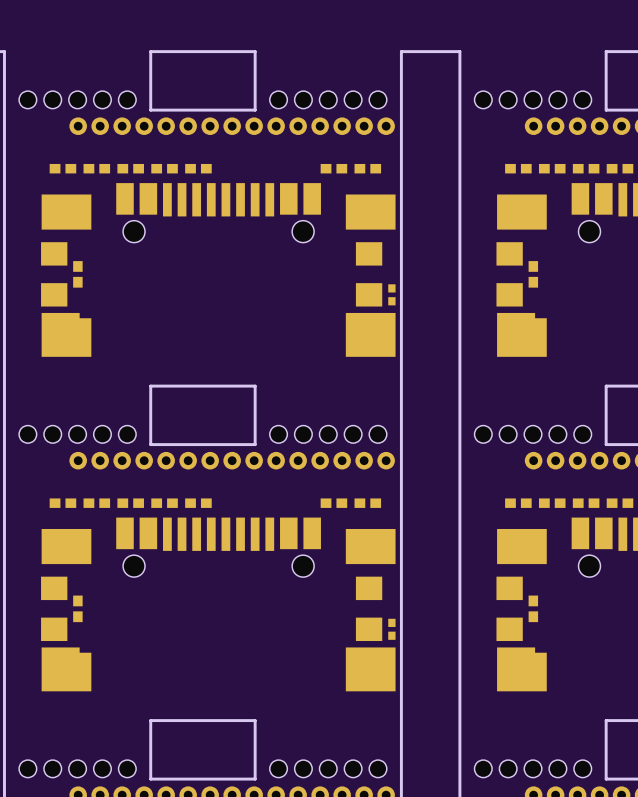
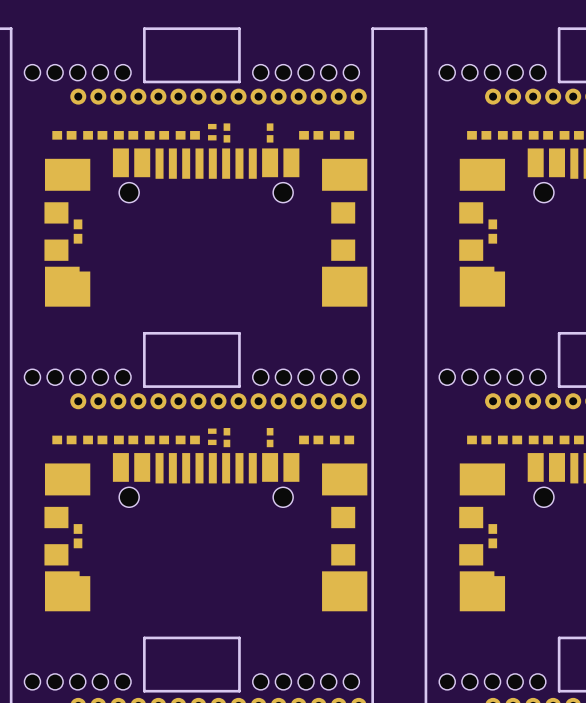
part: none -> (212, 132)
part: none -> (226, 132)
part: none -> (270, 132)
part: (391, 294) -> none
part: none -> (212, 436)
part: none -> (226, 437)
part: none -> (270, 437)
part: (391, 629) -> none

